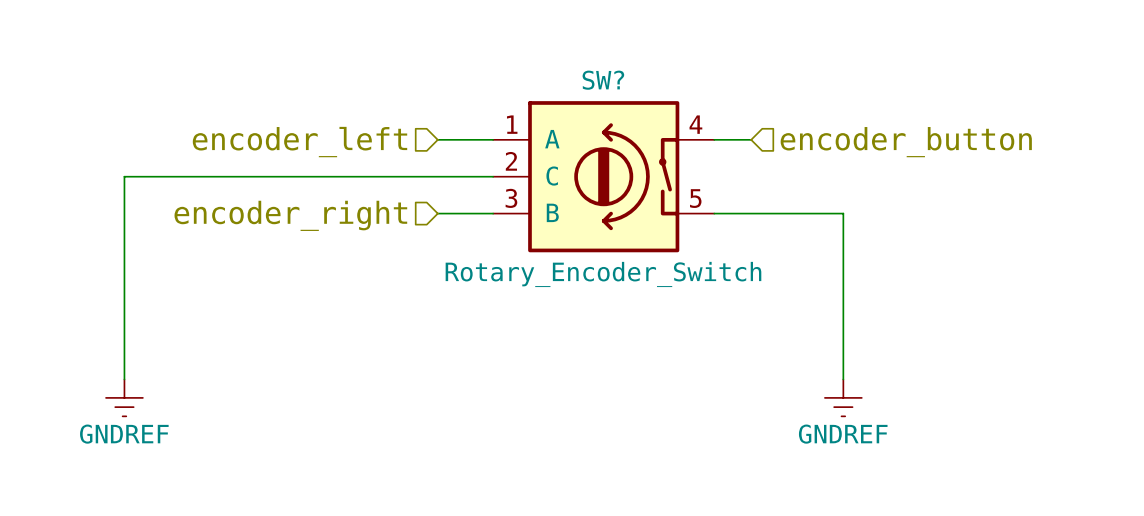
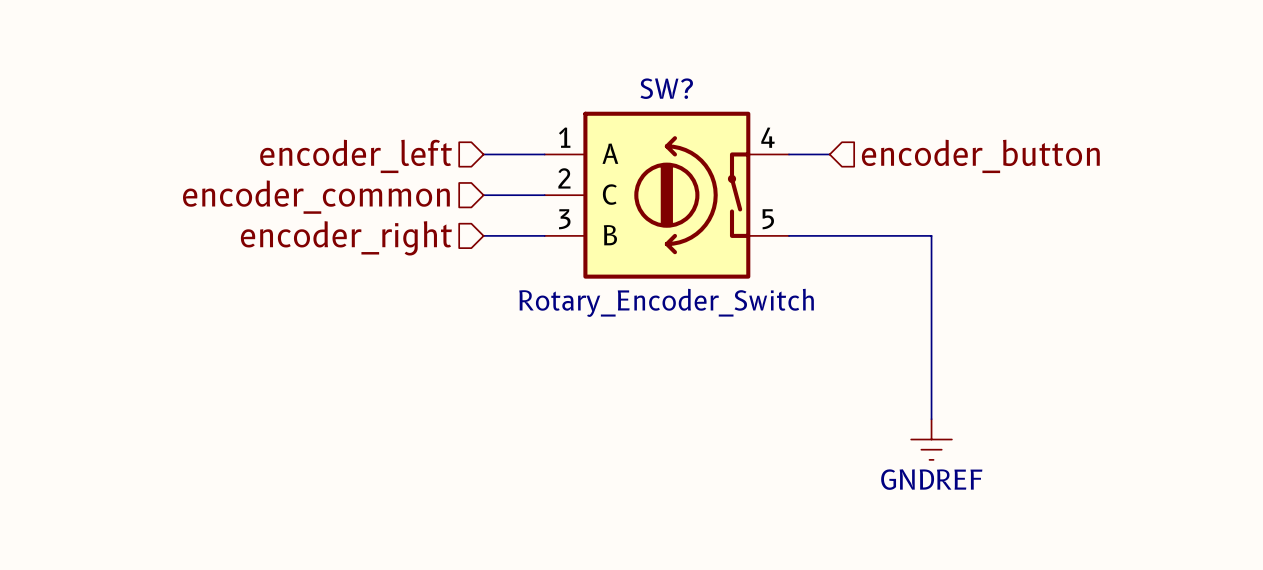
wire: (437, 176) (124, 176) (124, 379) -> none
hierarchical label: none -> encoder_common (316, 197)
power symbol: GNDREF (124, 397) -> none

